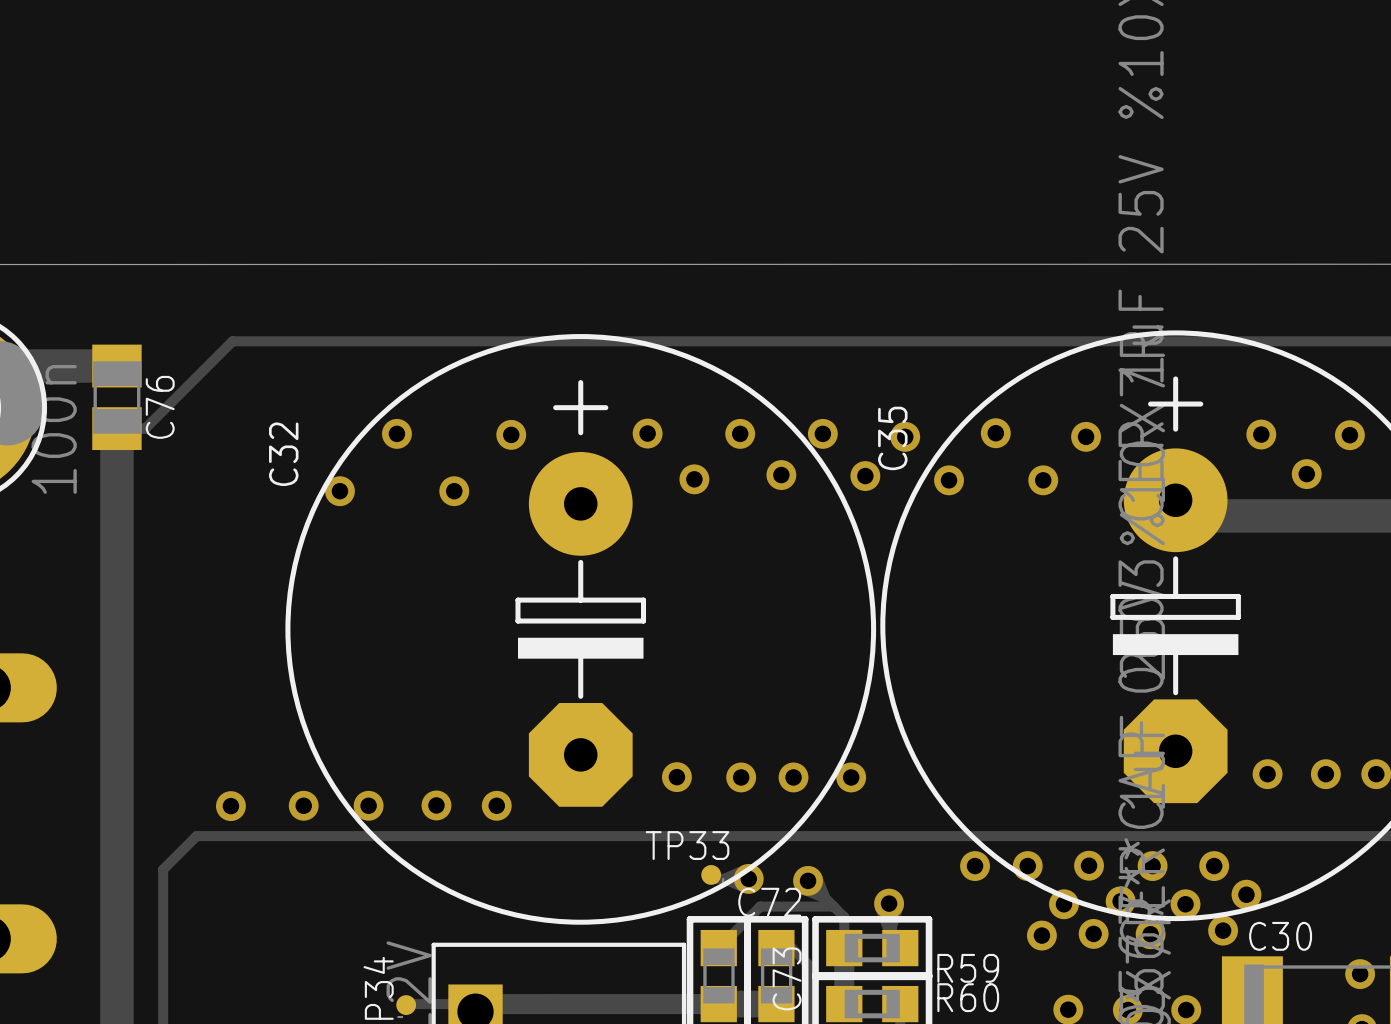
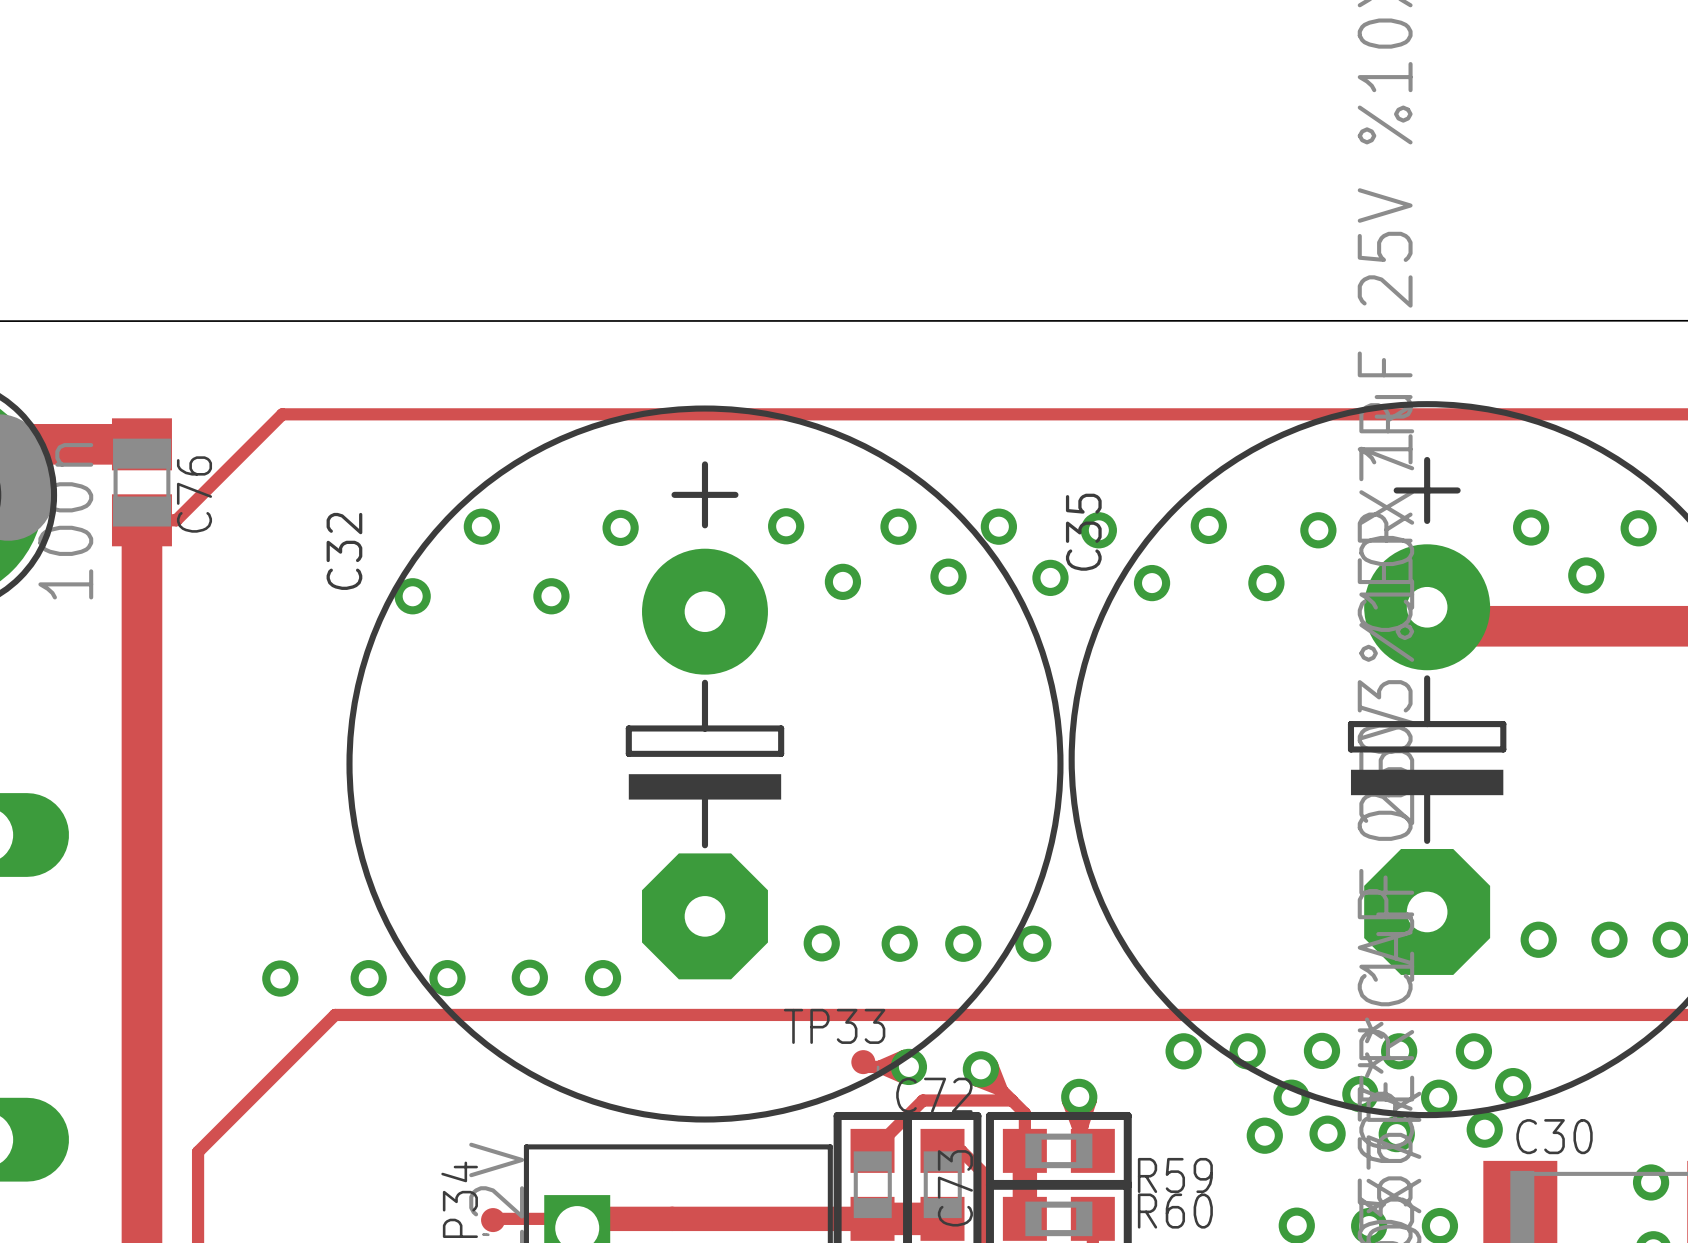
track: (276, 836) (196, 836) (163, 869) (163, 948) -> (335, 1014) (198, 1151)

